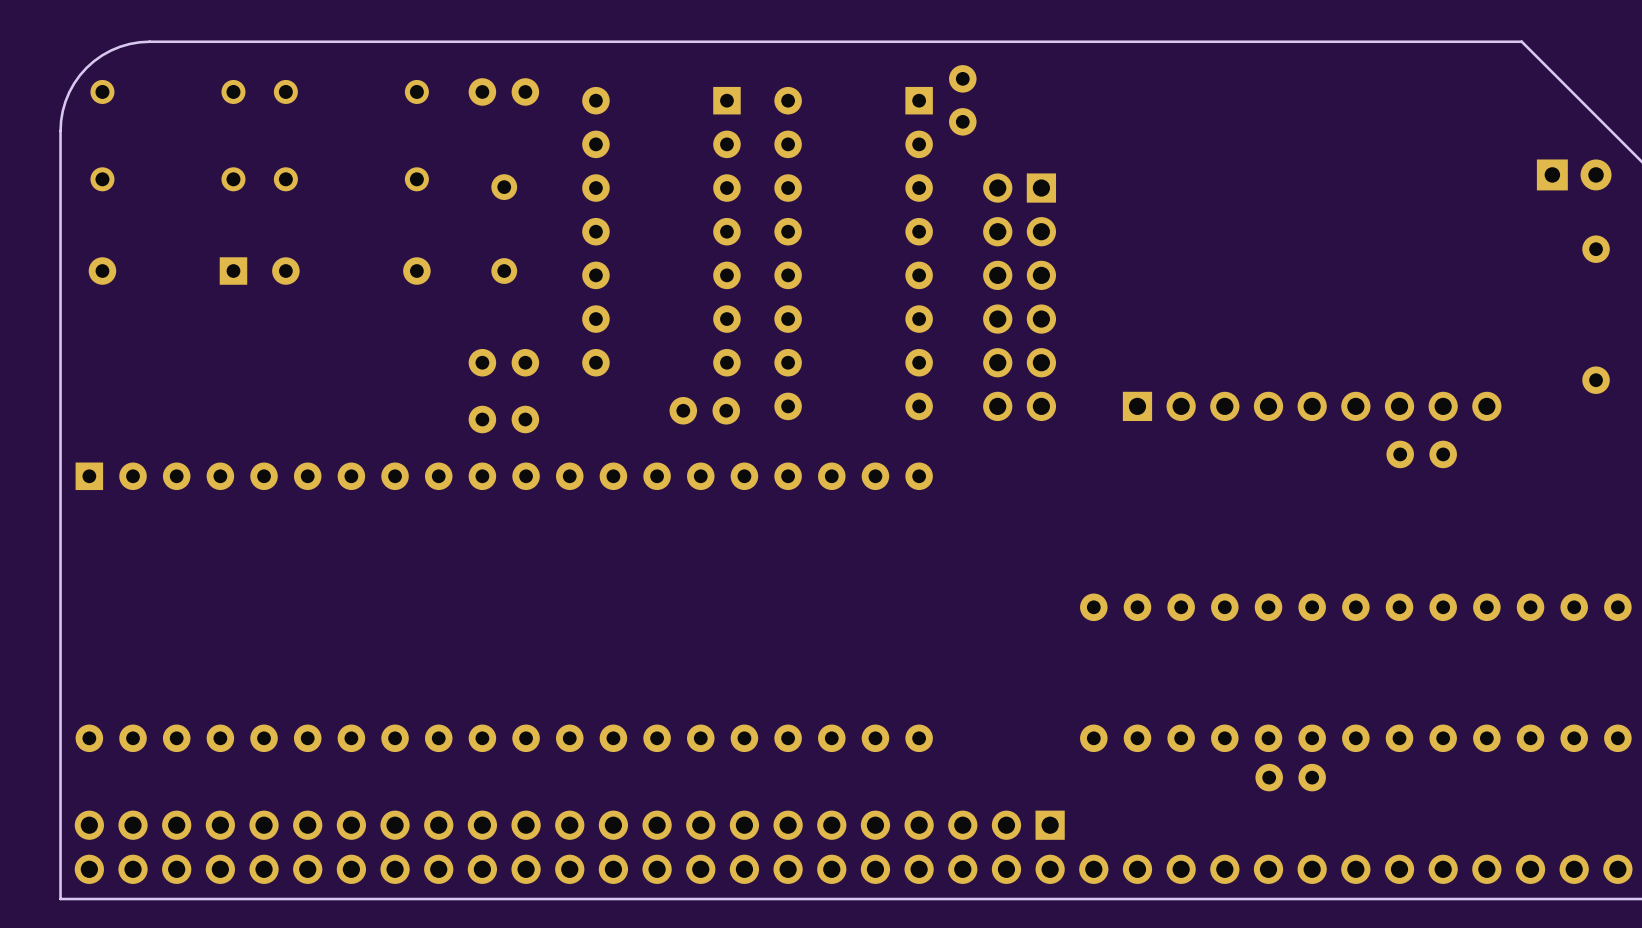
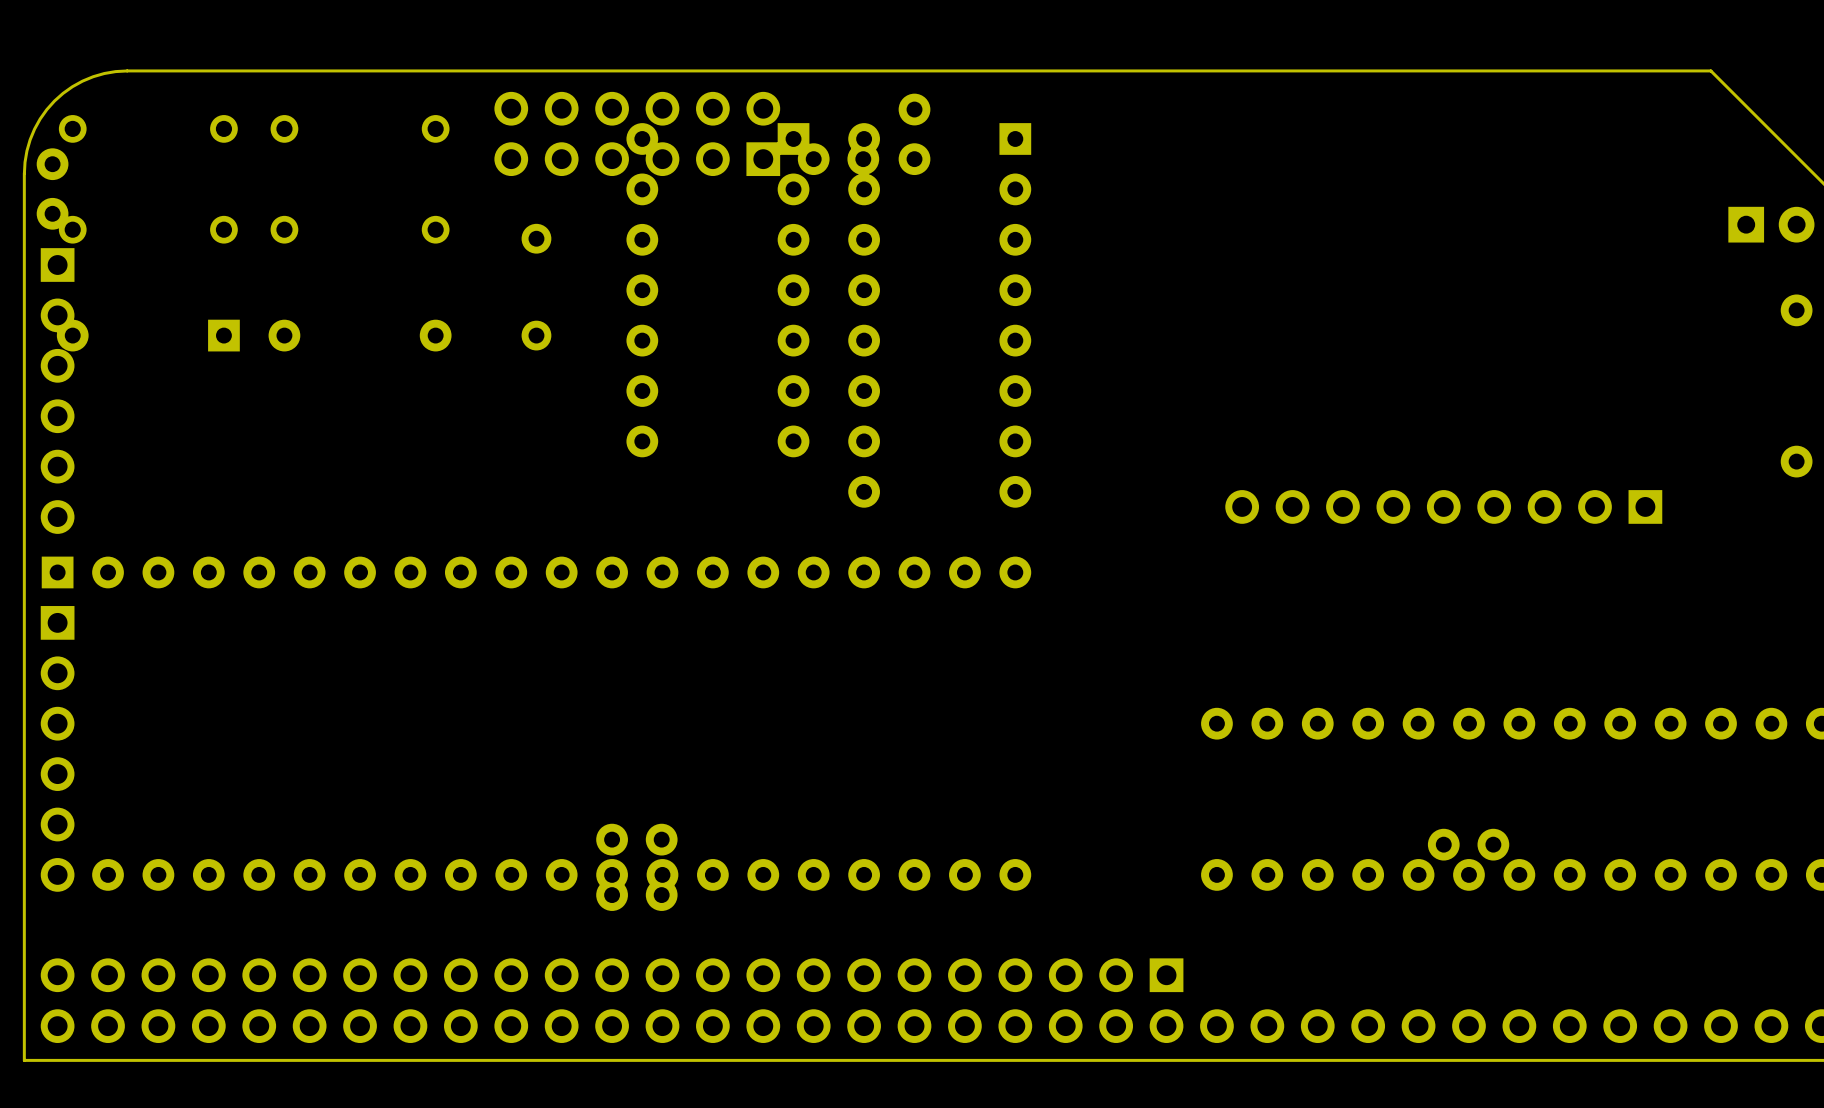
part: (503, 91) -> none
part: none -> (637, 133)
part: none -> (914, 134)
part: (962, 100) -> none
part: none -> (838, 159)
part: none -> (52, 188)
part: (1019, 297) -> none
part: none -> (57, 391)
part: (503, 362) -> none
part rotation: 0° (1312, 406) -> 180° (1443, 506)
part: (704, 410) -> none
part: (503, 419) -> none
part: (1421, 454) -> none
part: none -> (57, 748)
part: none -> (636, 839)
part: none -> (636, 895)
part position: (1290, 777) -> (1468, 844)

